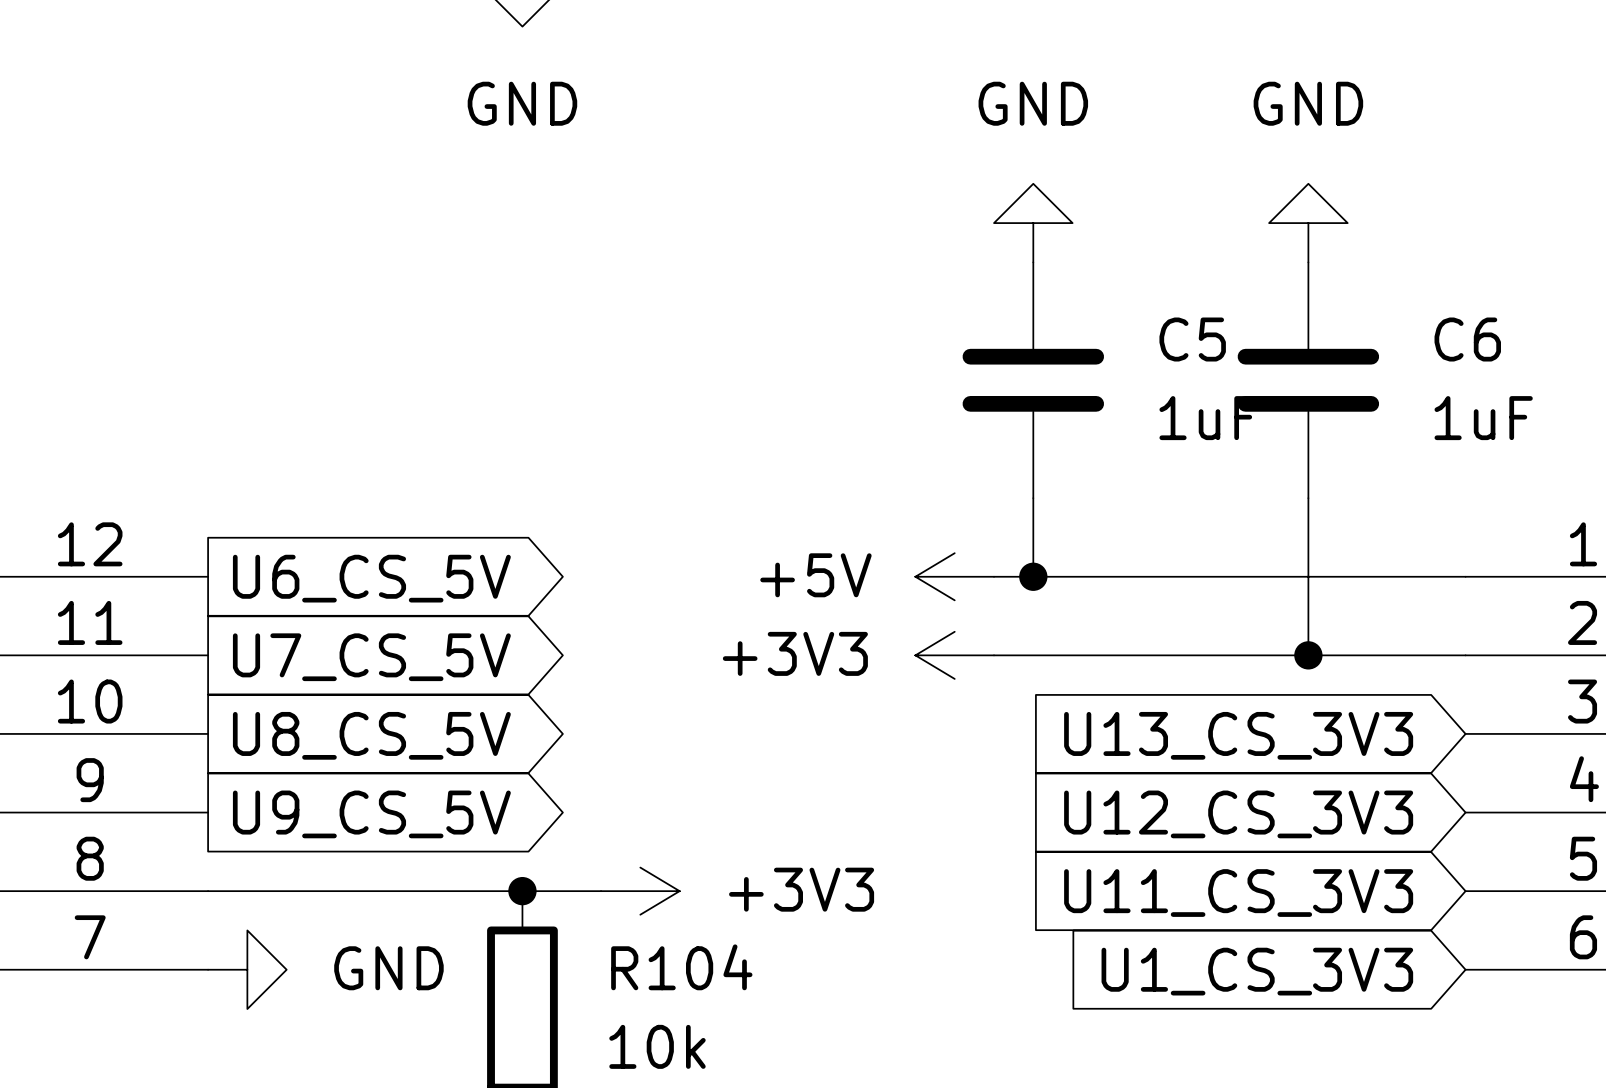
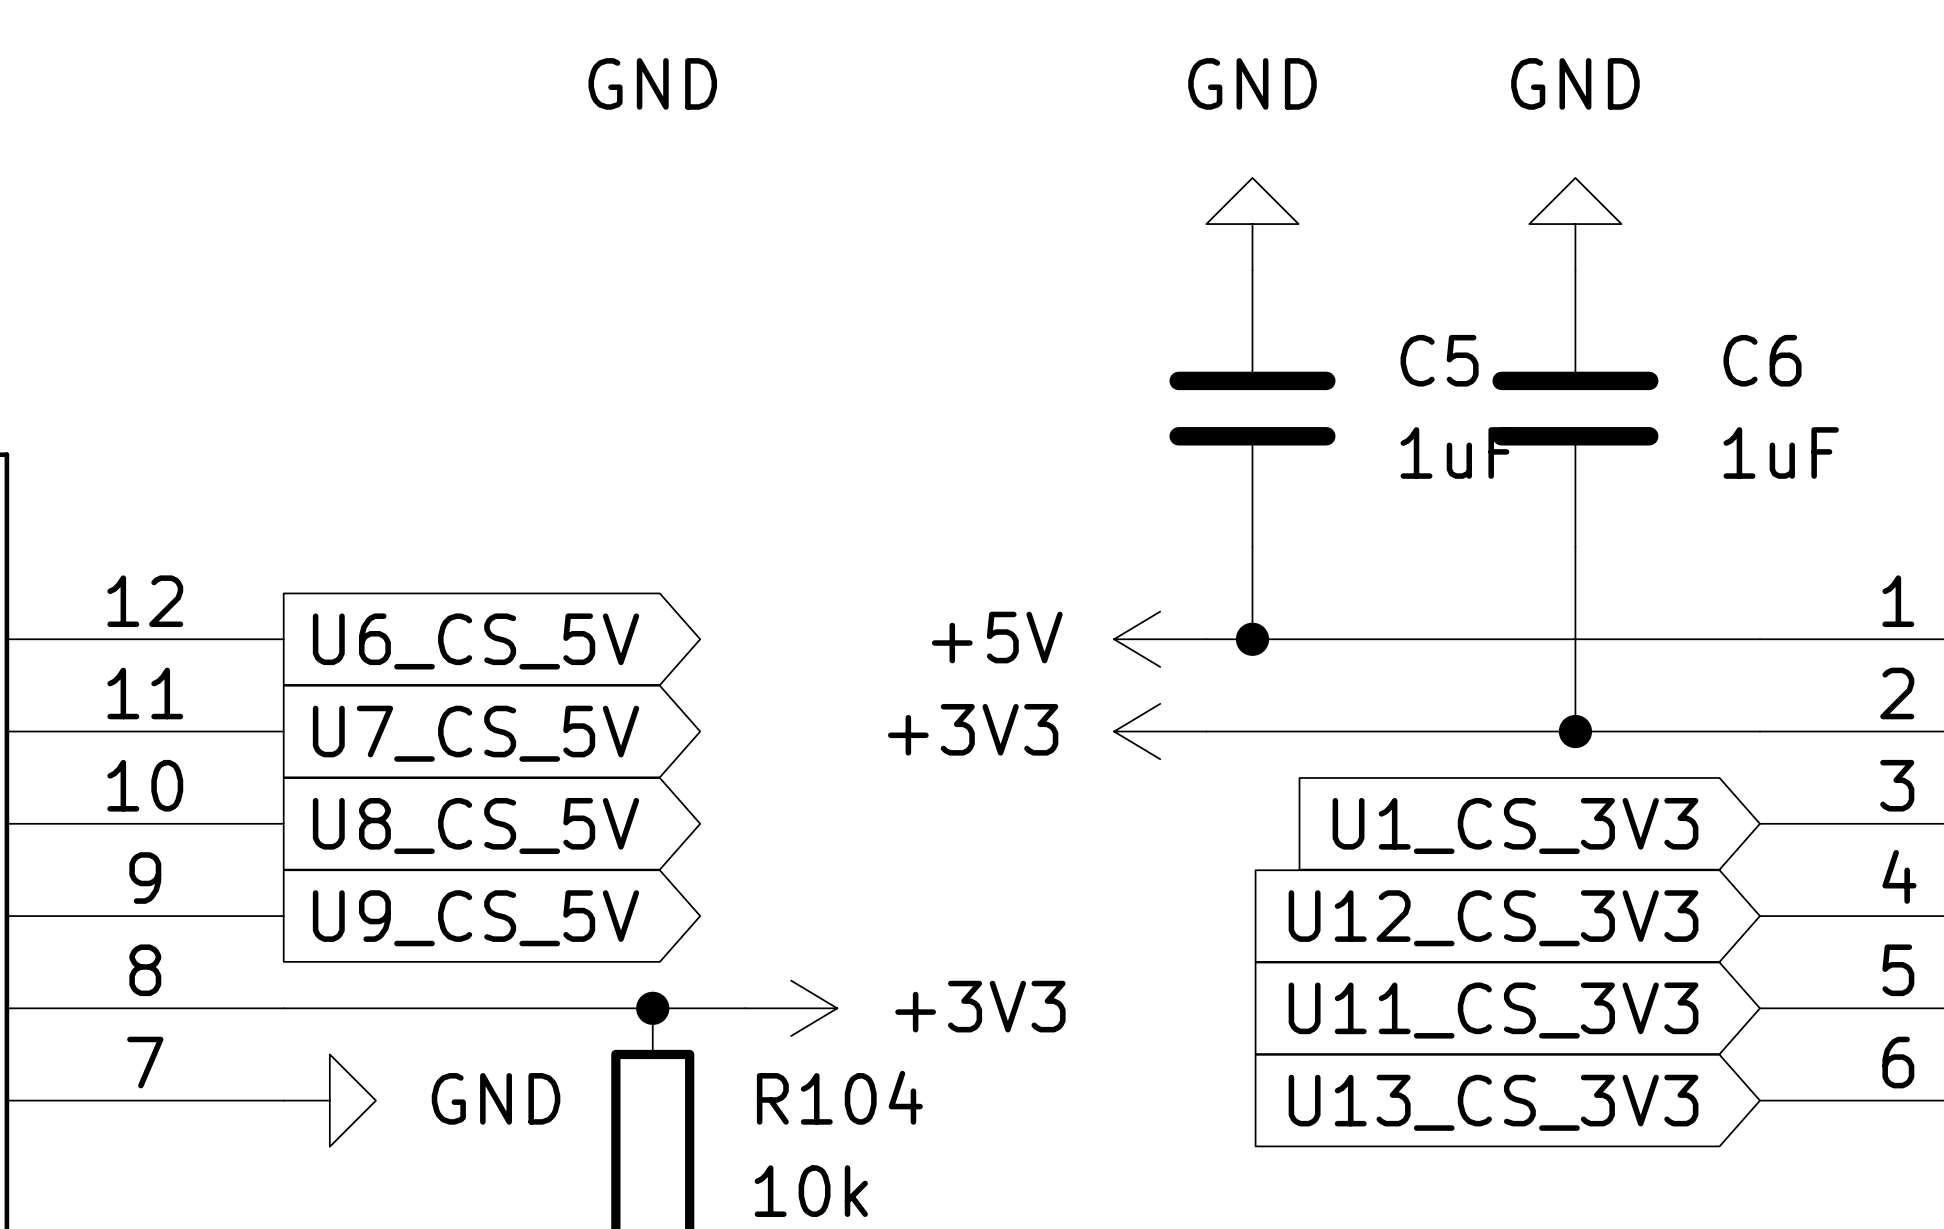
global label: U13_CS_3V3 (1238, 735) -> U1_CS_3V3 (1515, 825)
global label: U1_CS_3V3 (1257, 971) -> U13_CS_3V3 (1493, 1102)

